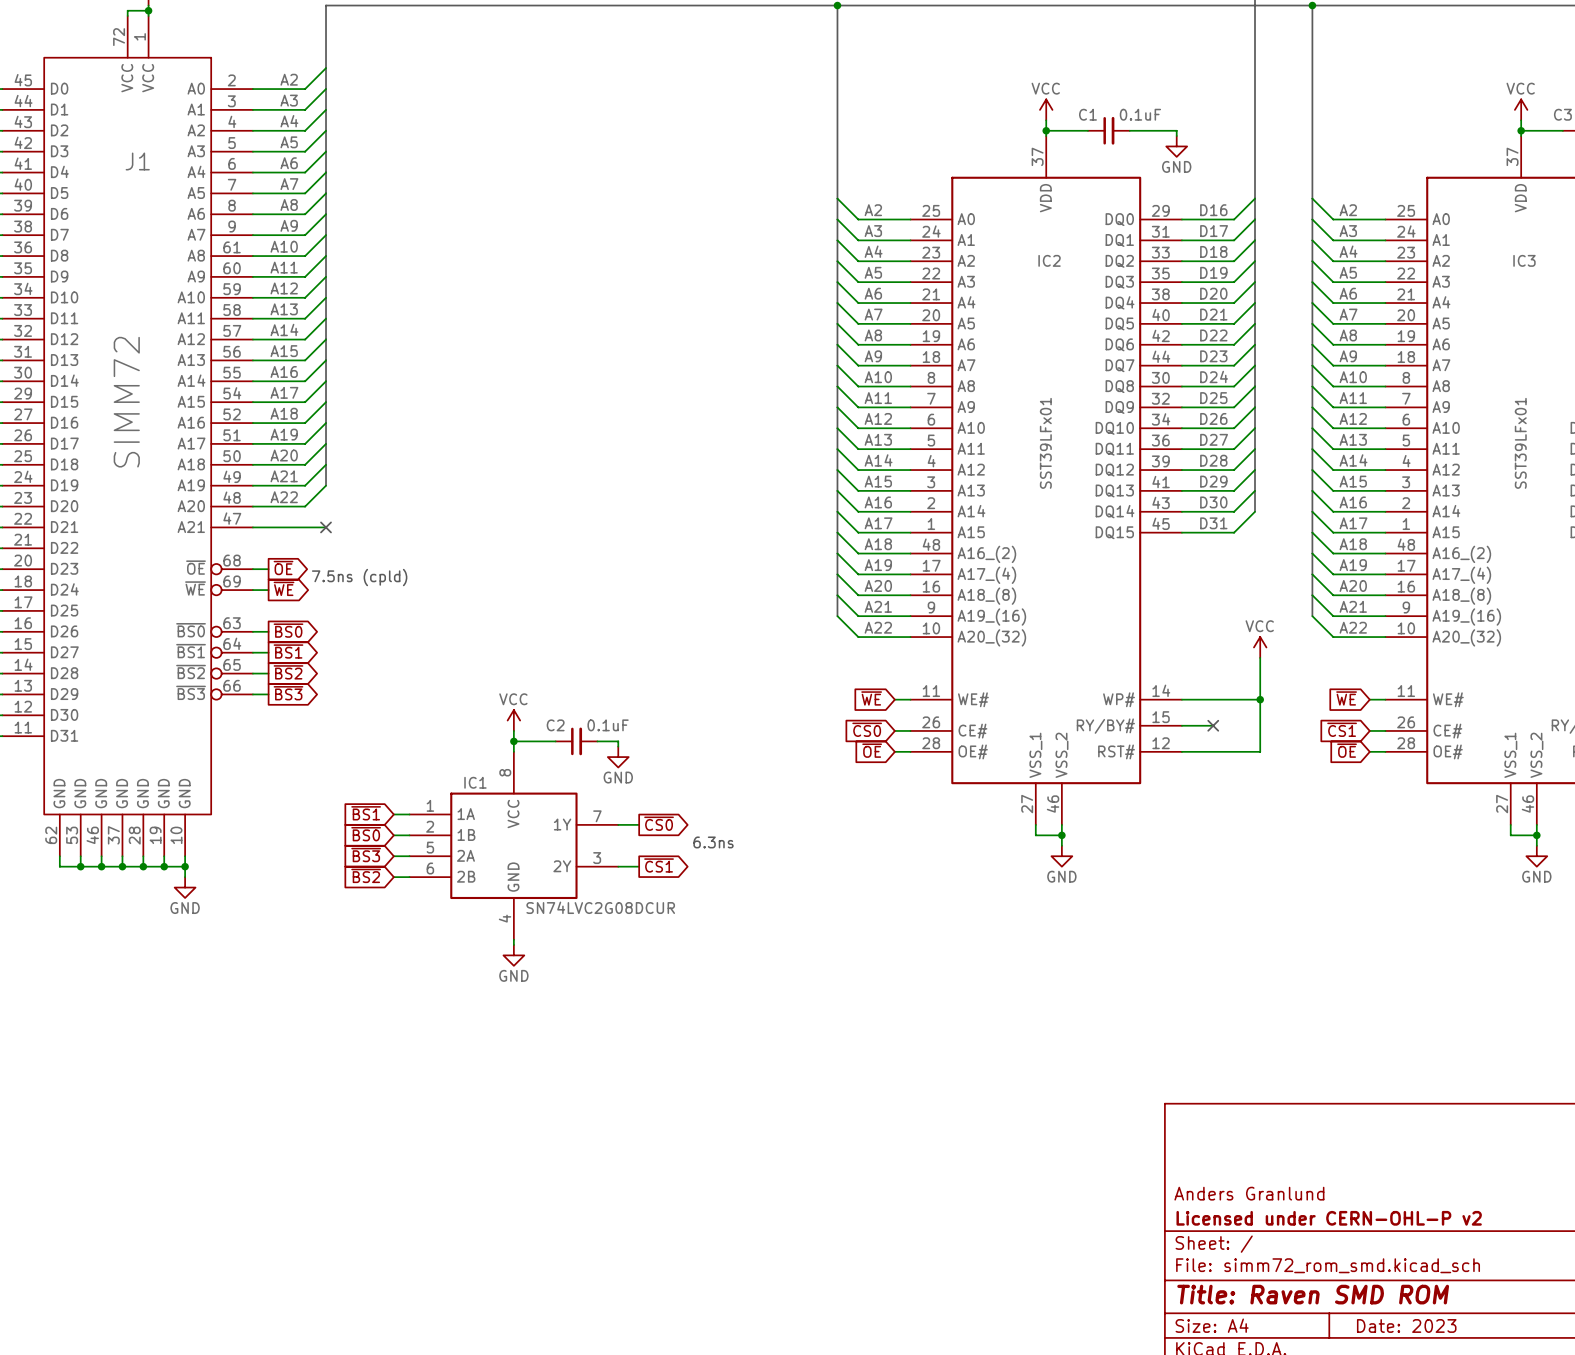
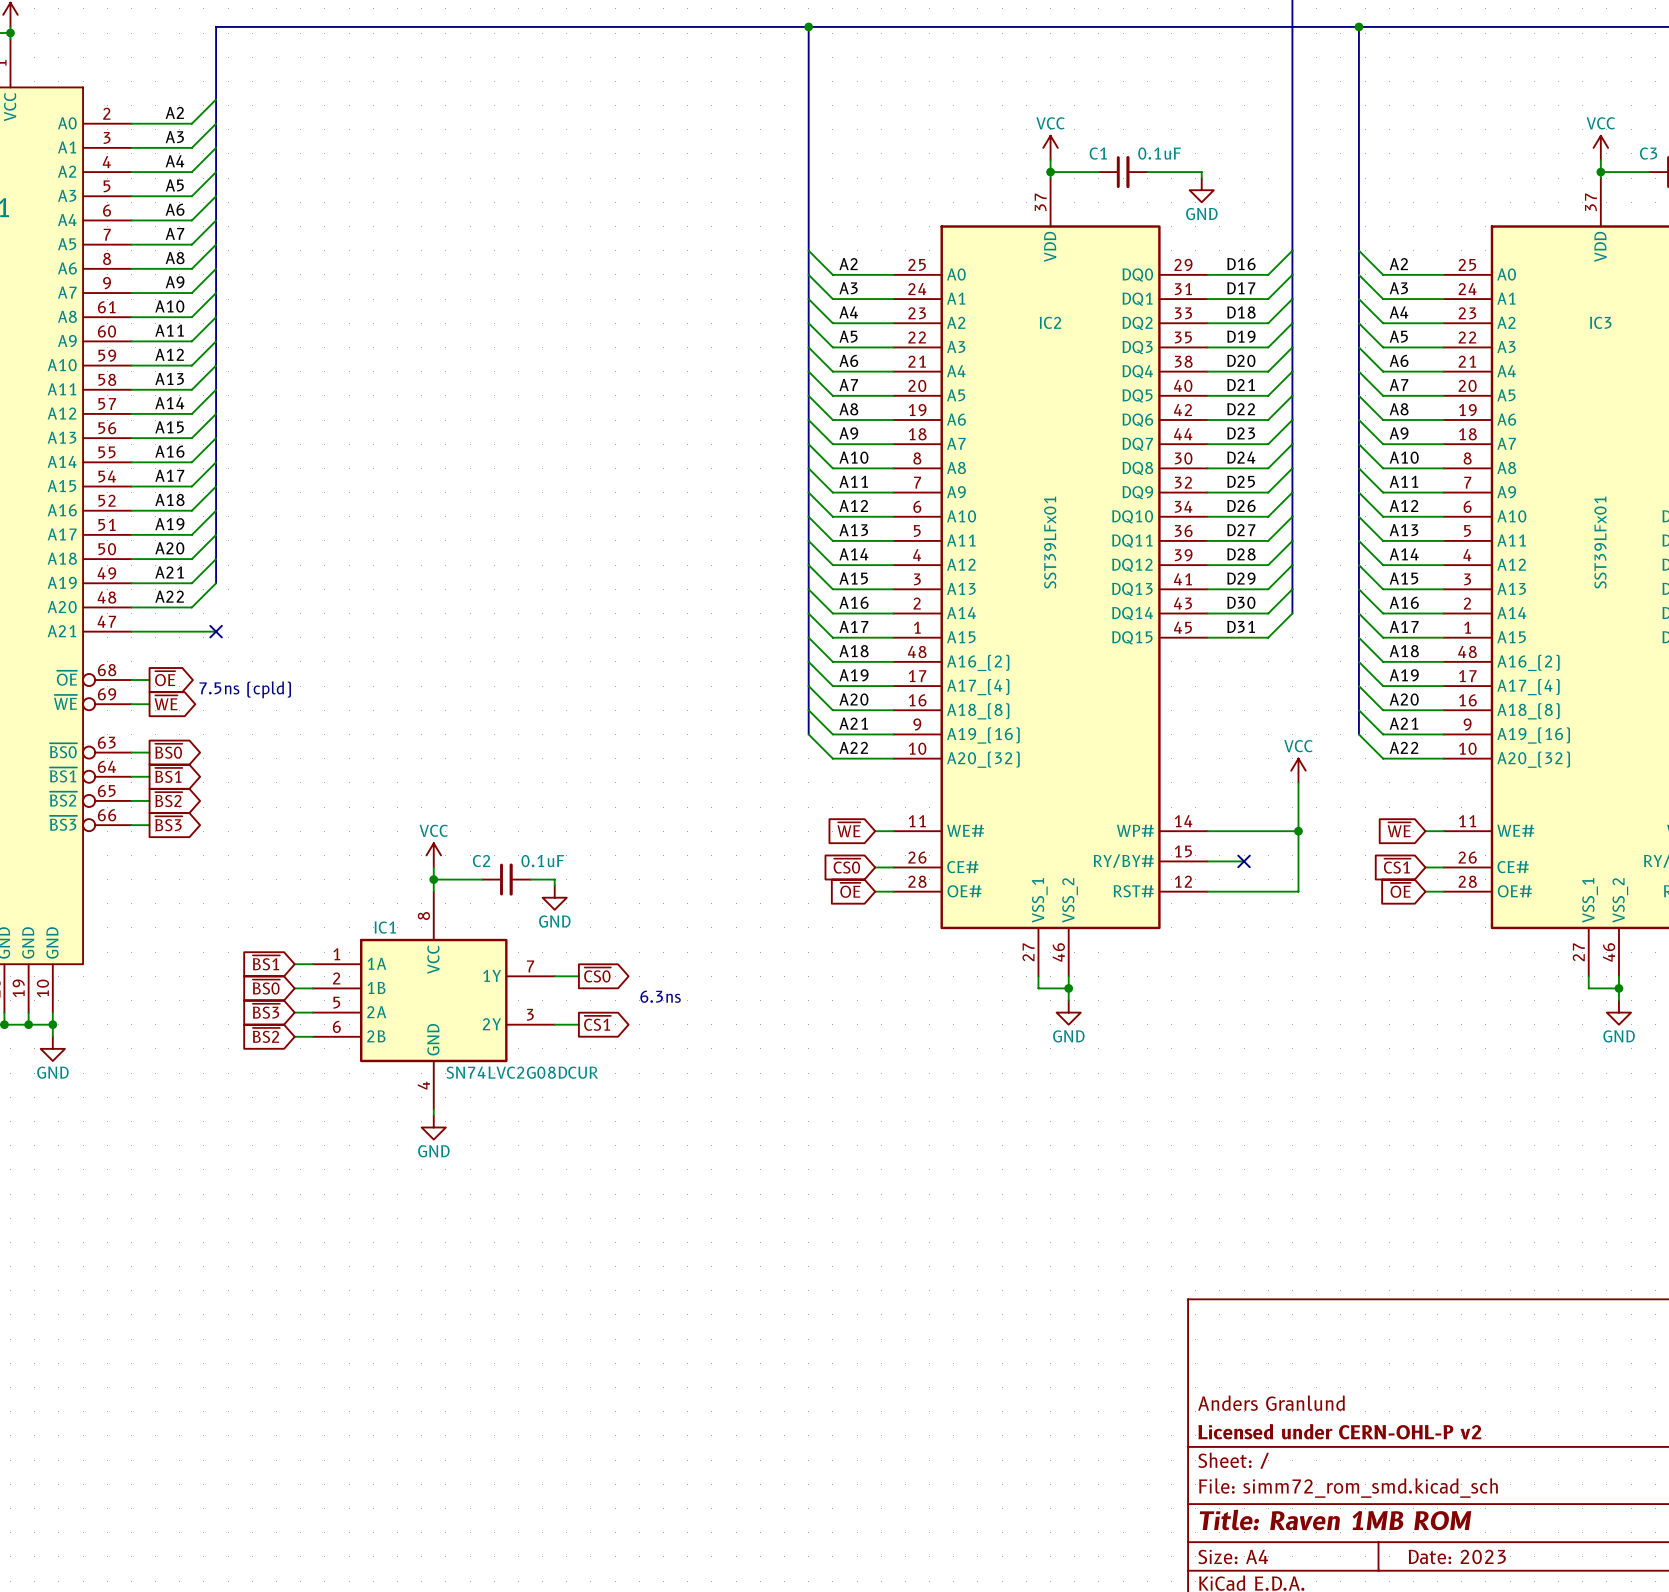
title block: Title: Raven SMD ROM (1313, 1294) -> Title: Raven 1MB ROM (1335, 1520)

